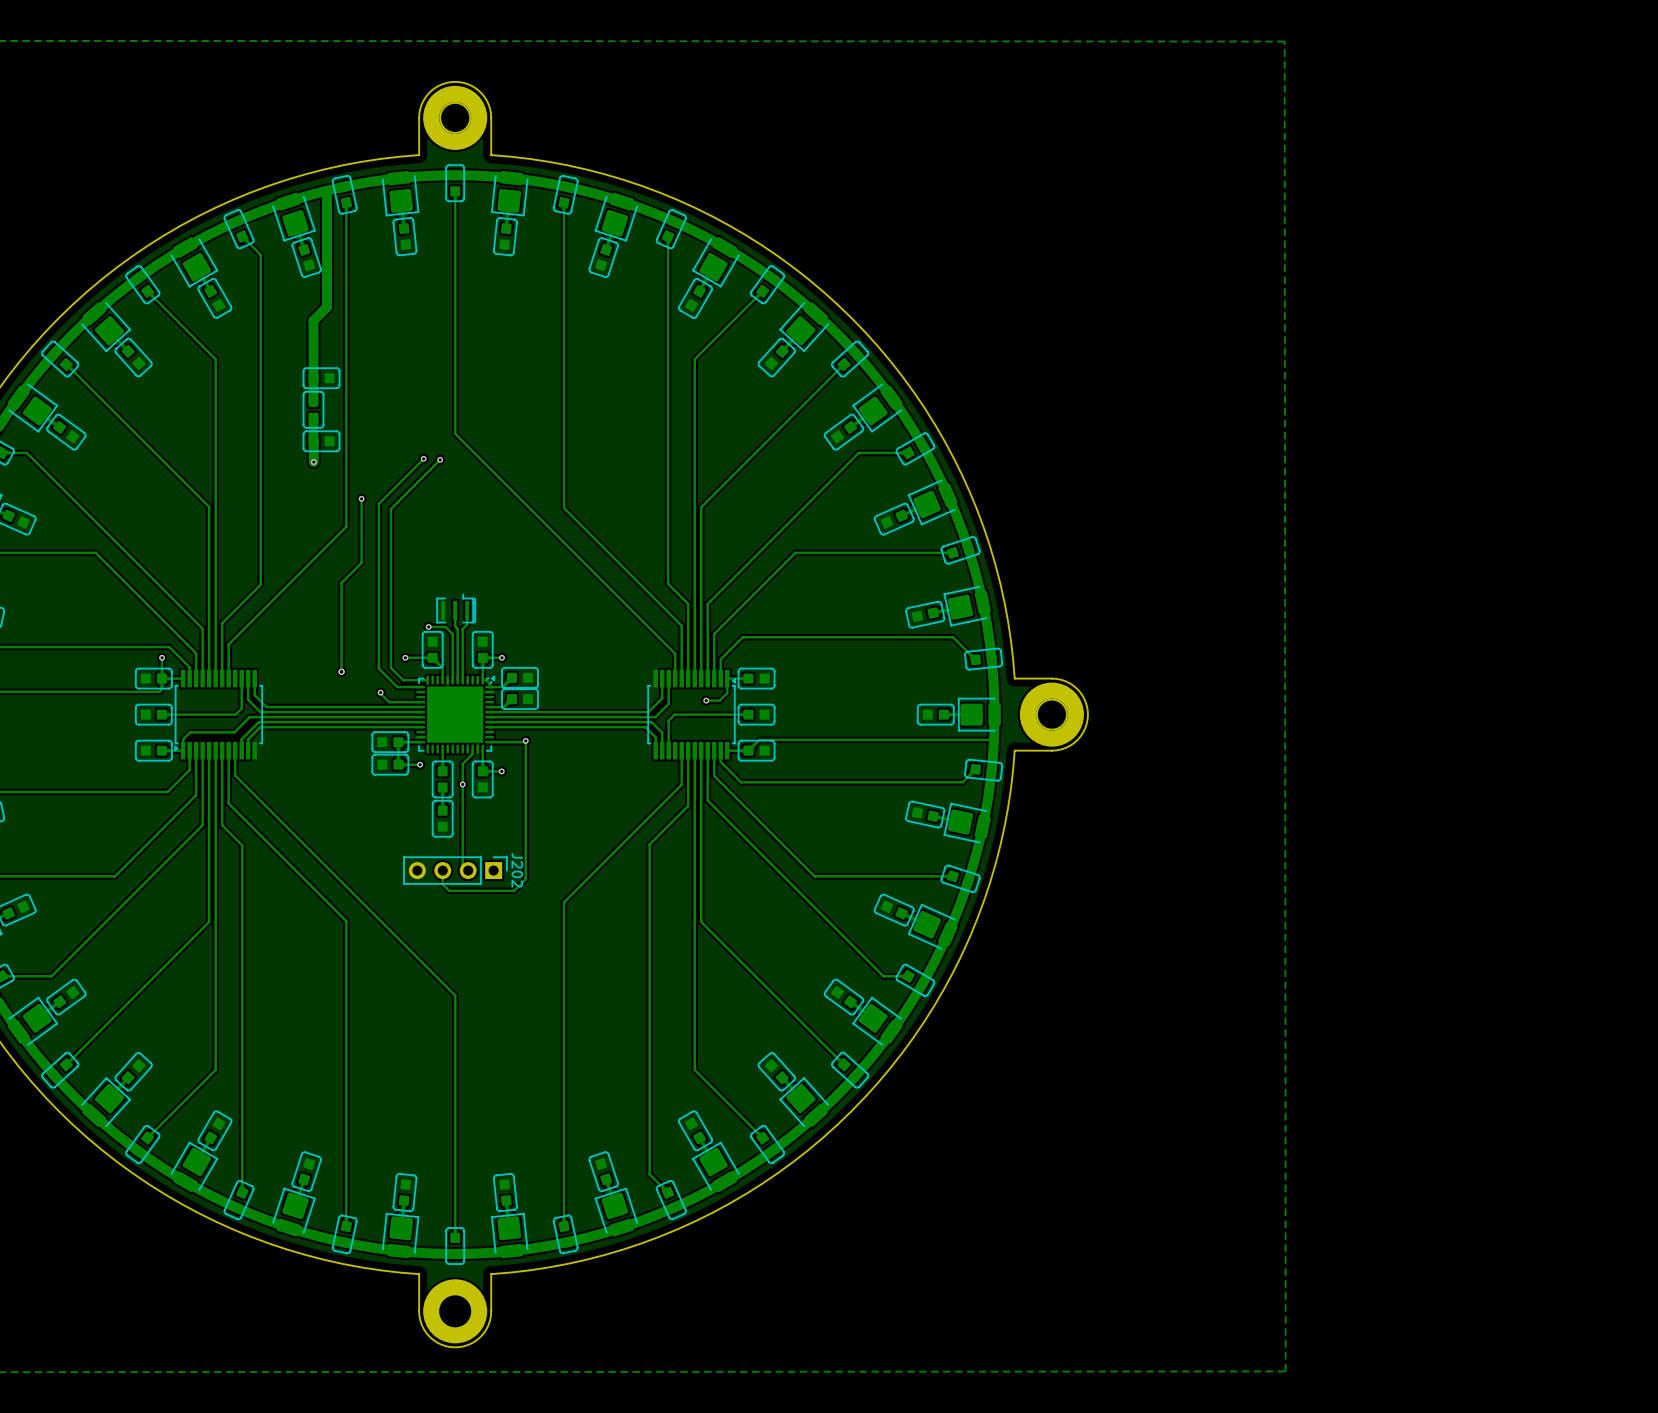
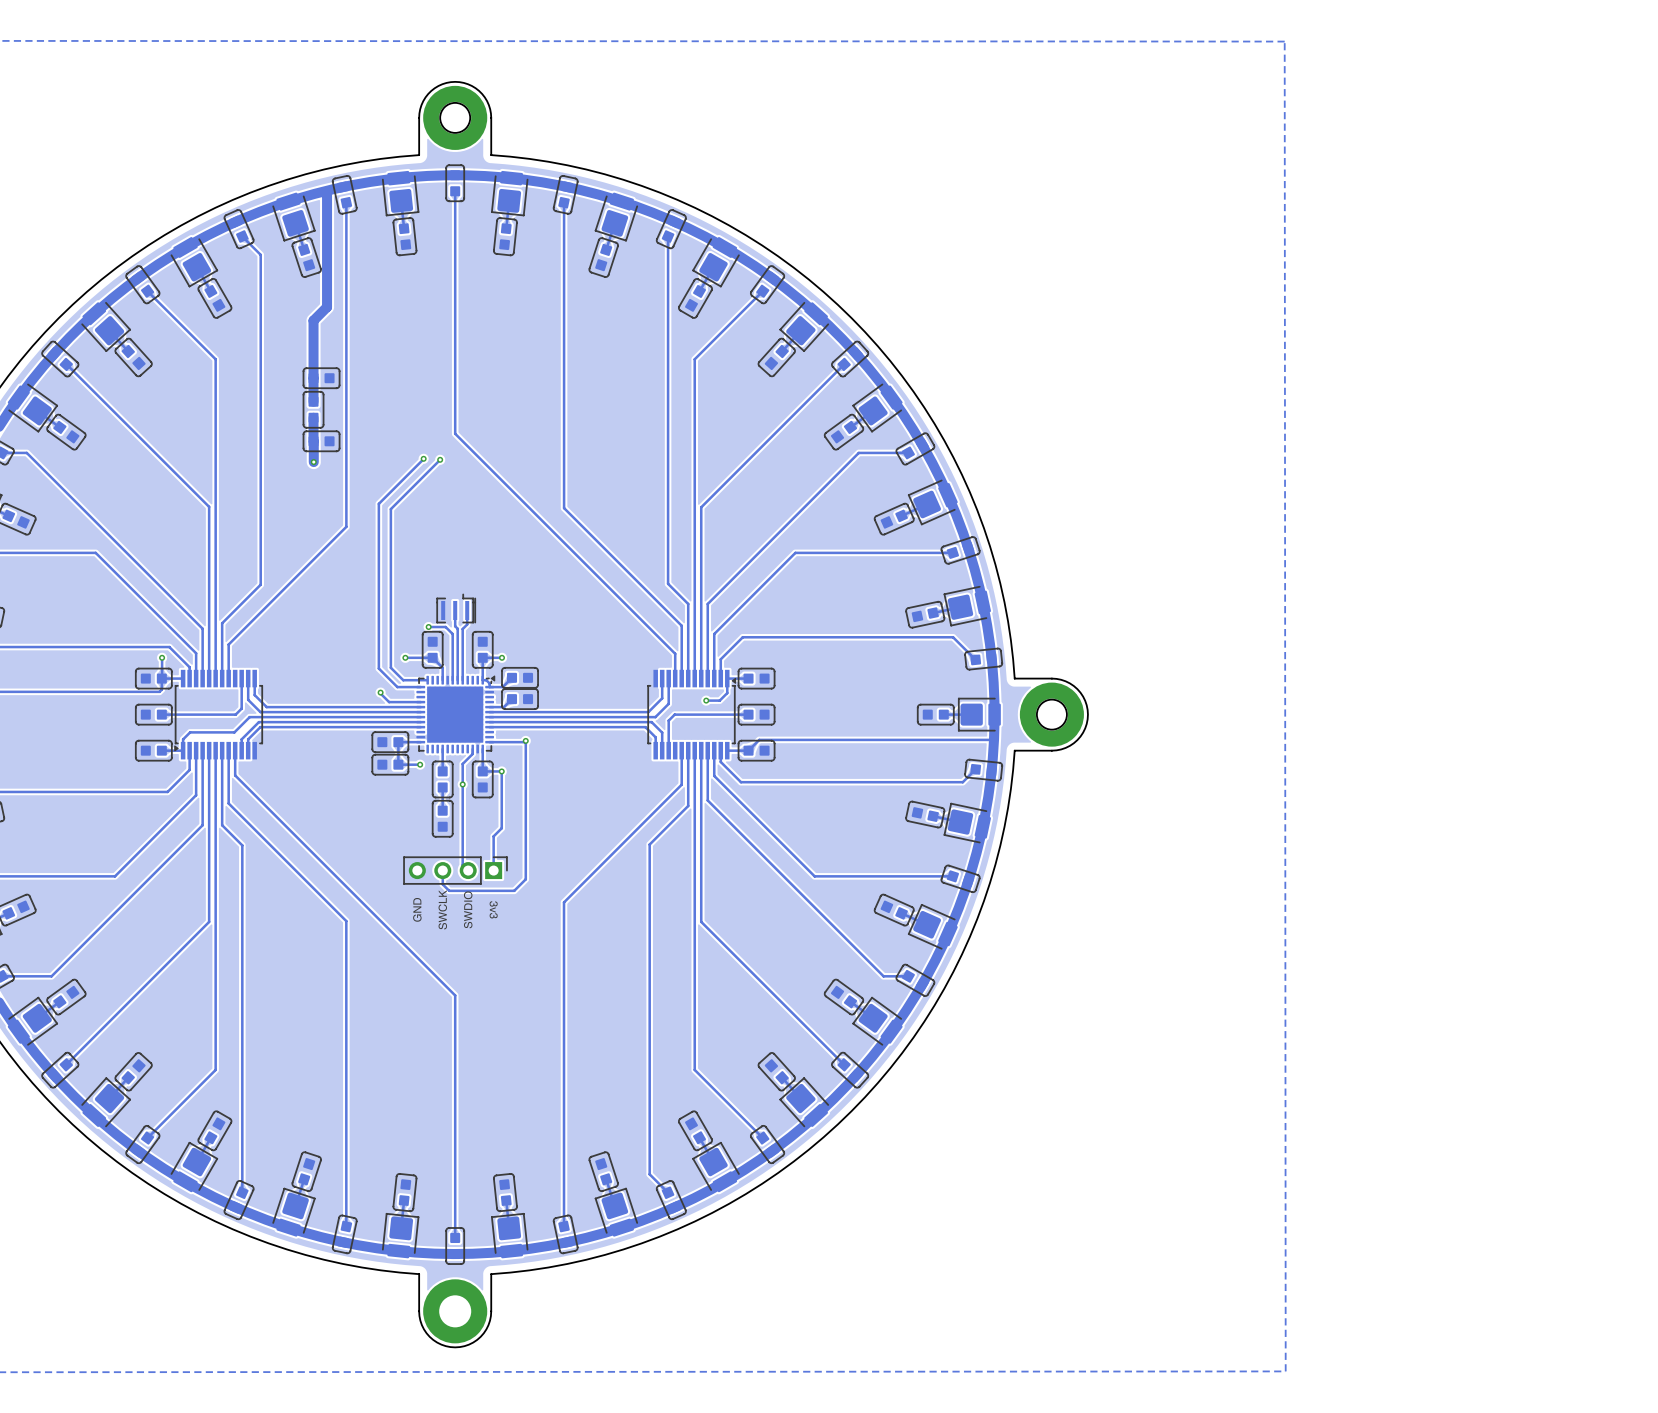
track: (361, 498) (361, 562) (341, 582) (341, 671) -> none
via: (361, 498) -> none
via: (341, 671) -> none
track: none -> (501, 771) (501, 828) (493, 836) (493, 870)
J202 name: J202 (517, 870) -> none
drawing: none -> [438, 890, 448, 930]
drawing: none -> [463, 891, 473, 929]
drawing: none -> [413, 897, 422, 922]
drawing: none -> [489, 901, 498, 919]

